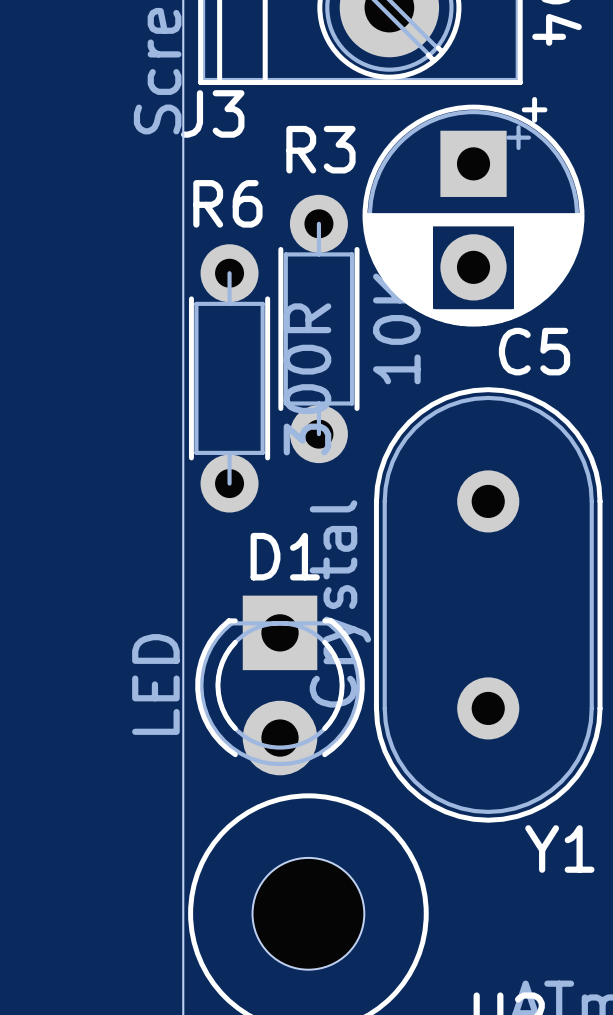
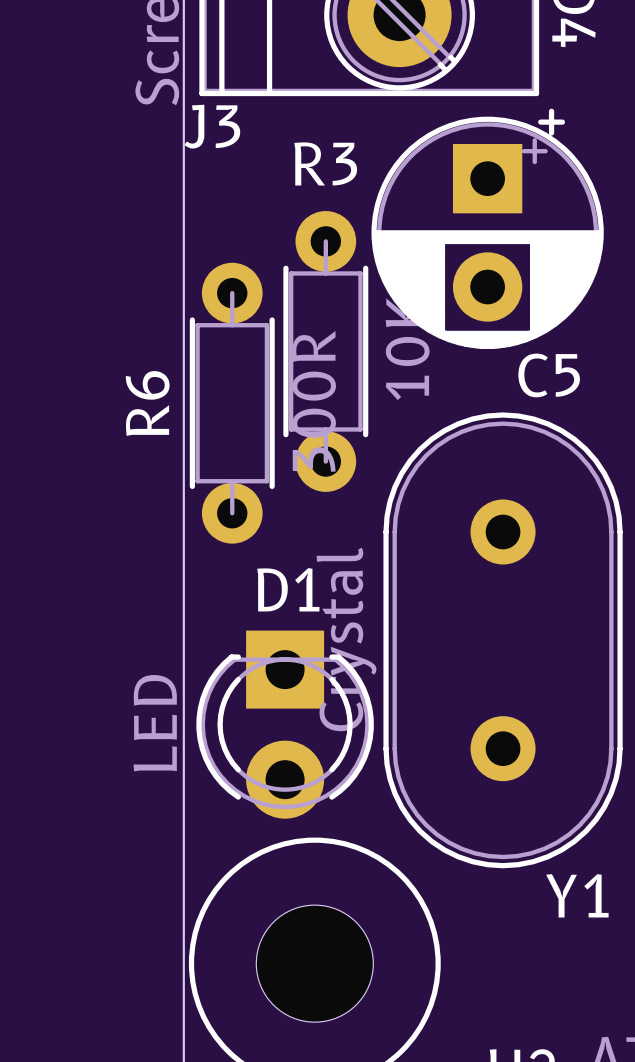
R6 name rotation: 0° (227, 203) -> 90° counterclockwise (147, 403)
R6 name position: R6 (227, 203) -> R6 (147, 403)

